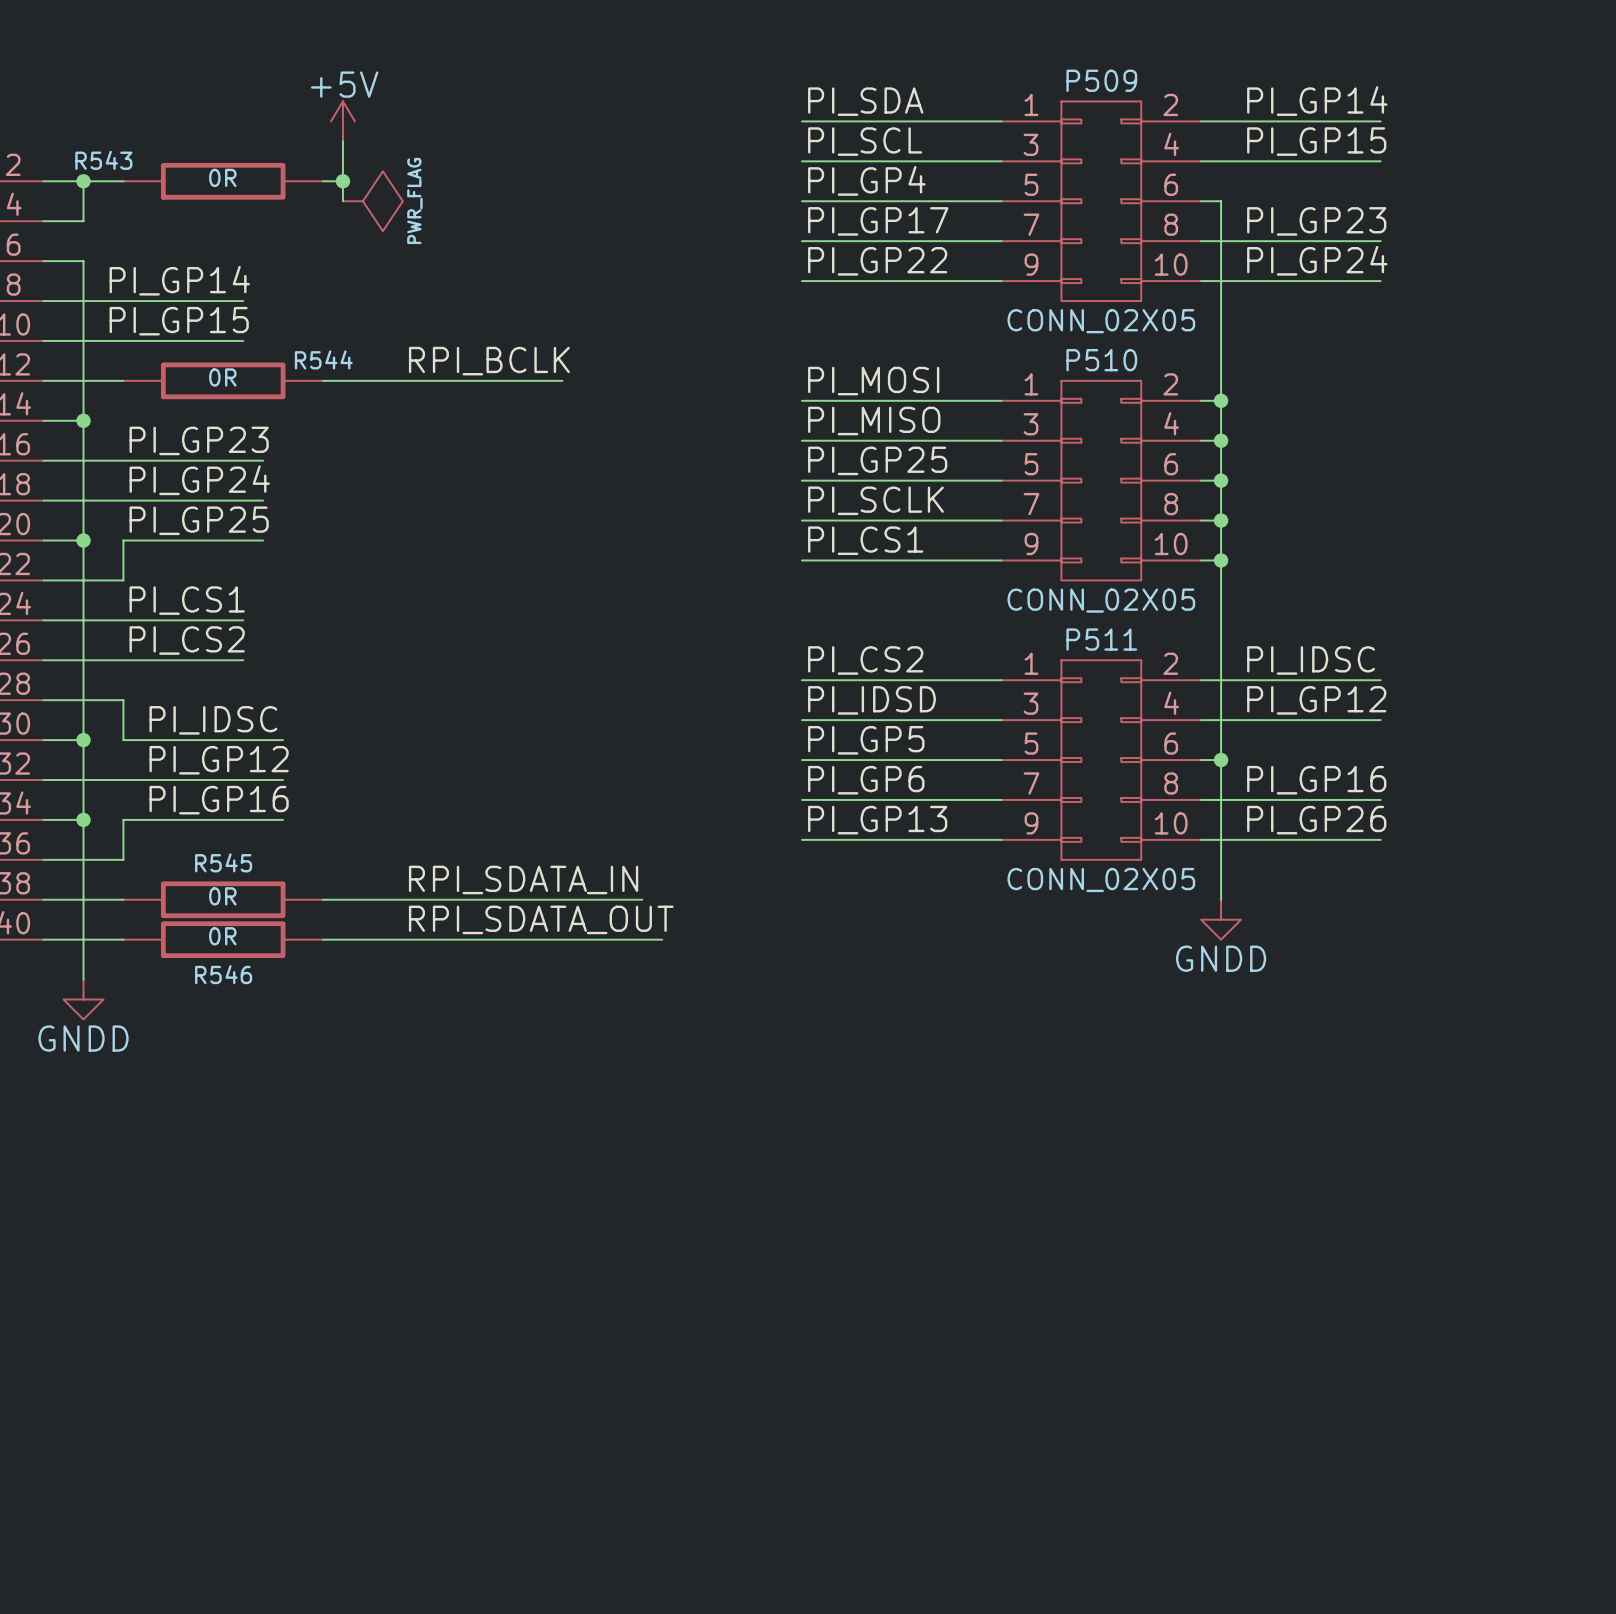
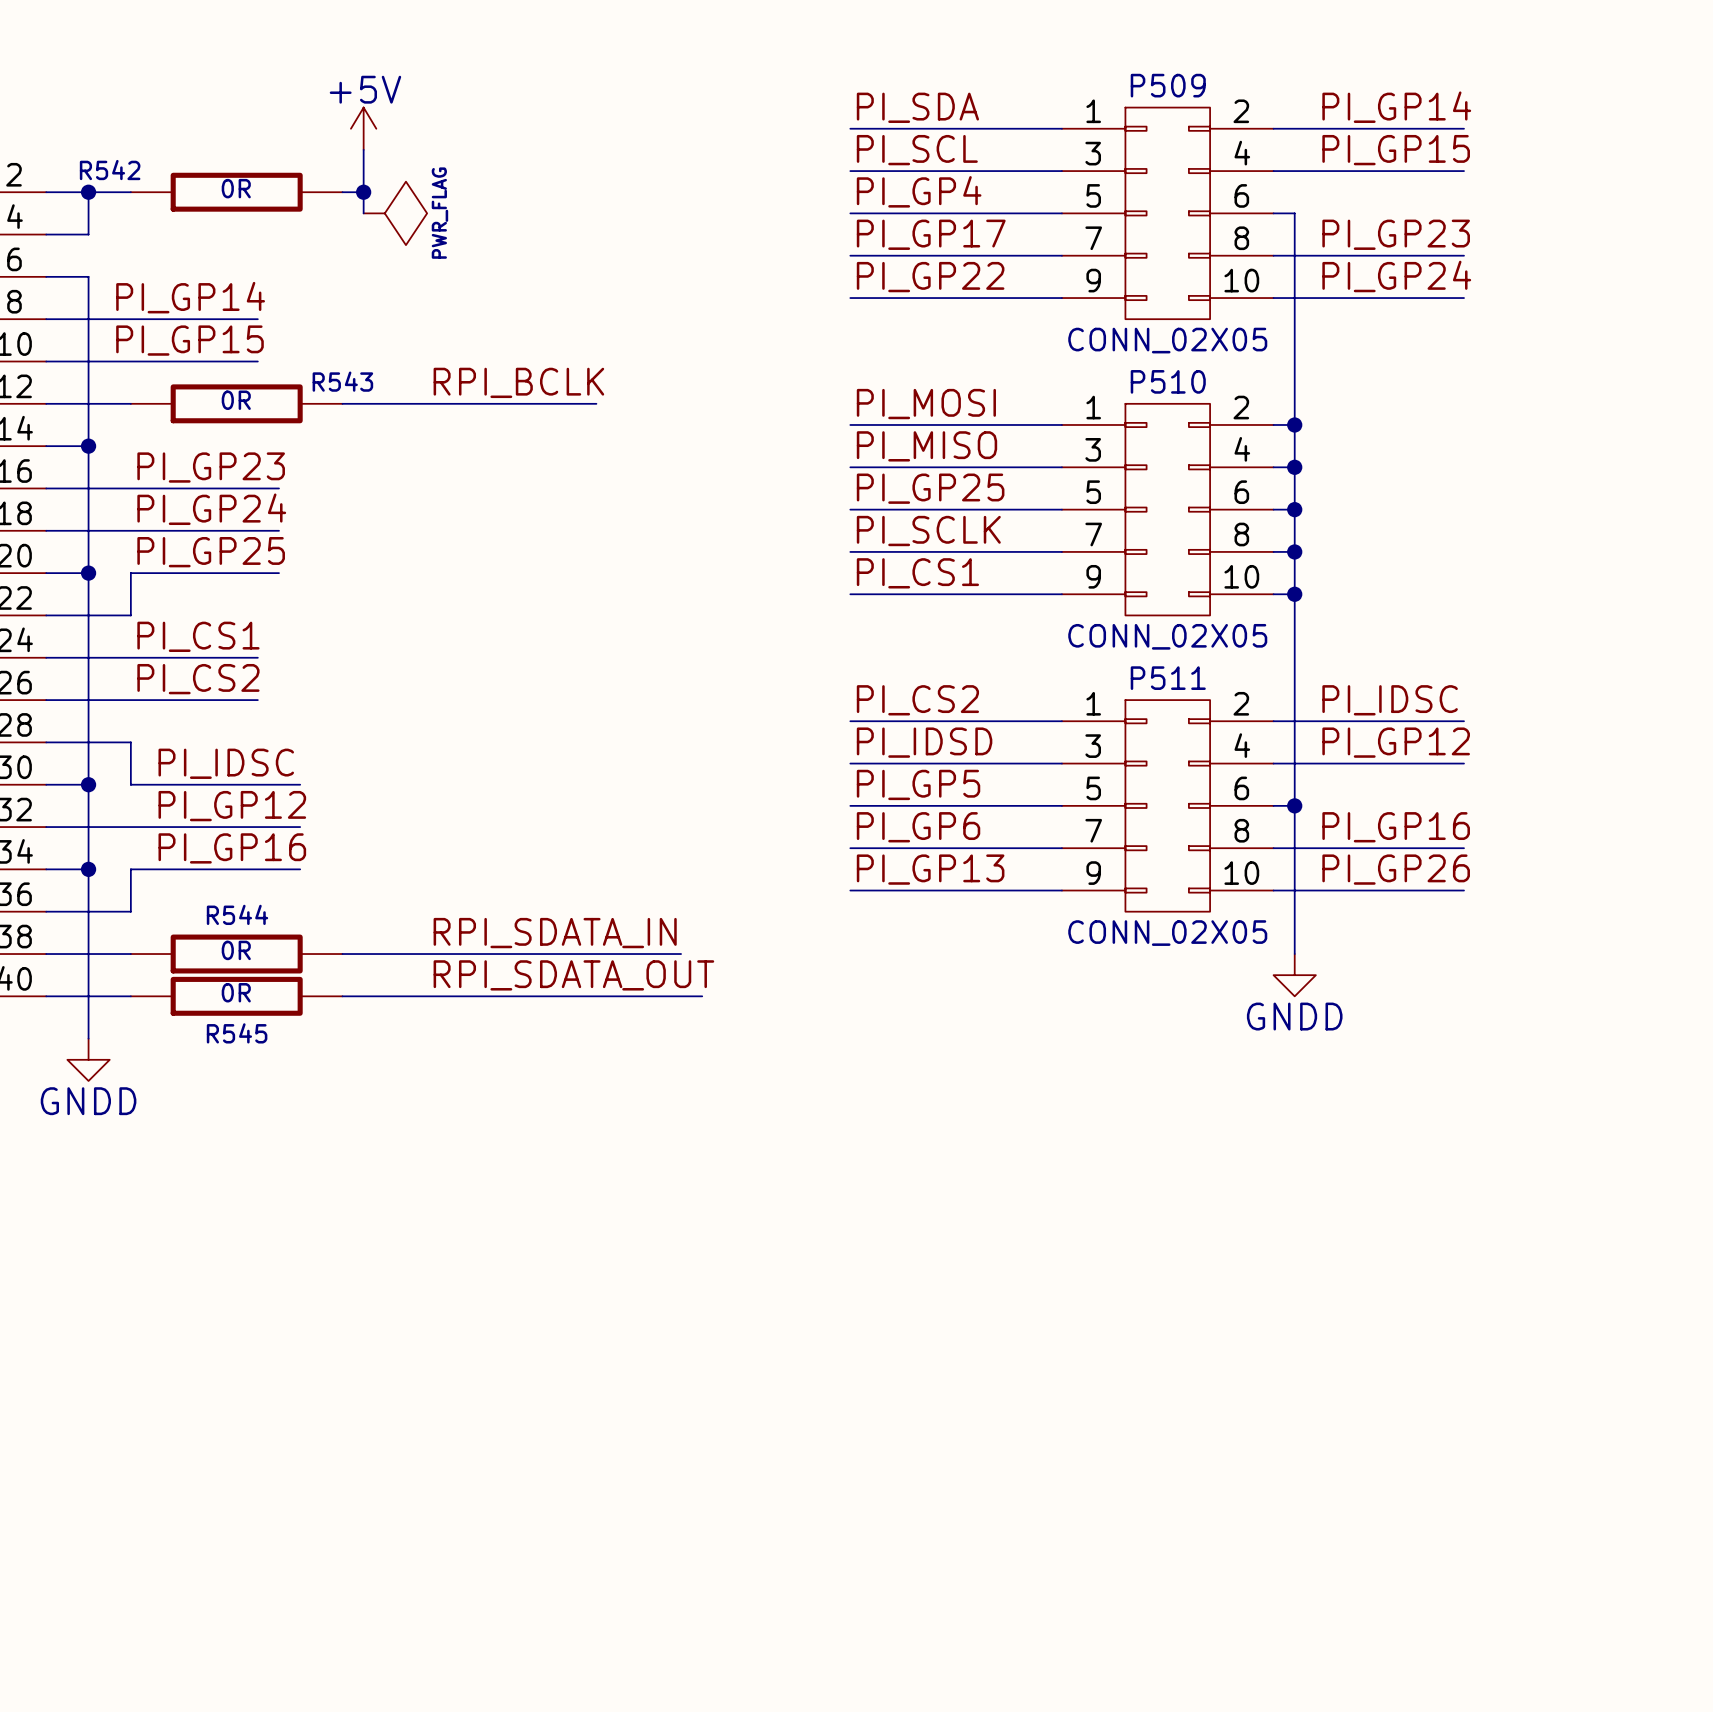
R543 name: R543 (103, 160) -> R542 (110, 170)
R544 name: R544 (323, 359) -> R543 (342, 381)
R545 name: R545 (223, 862) -> R544 (237, 914)
R546 name: R546 (223, 974) -> R545 (237, 1033)

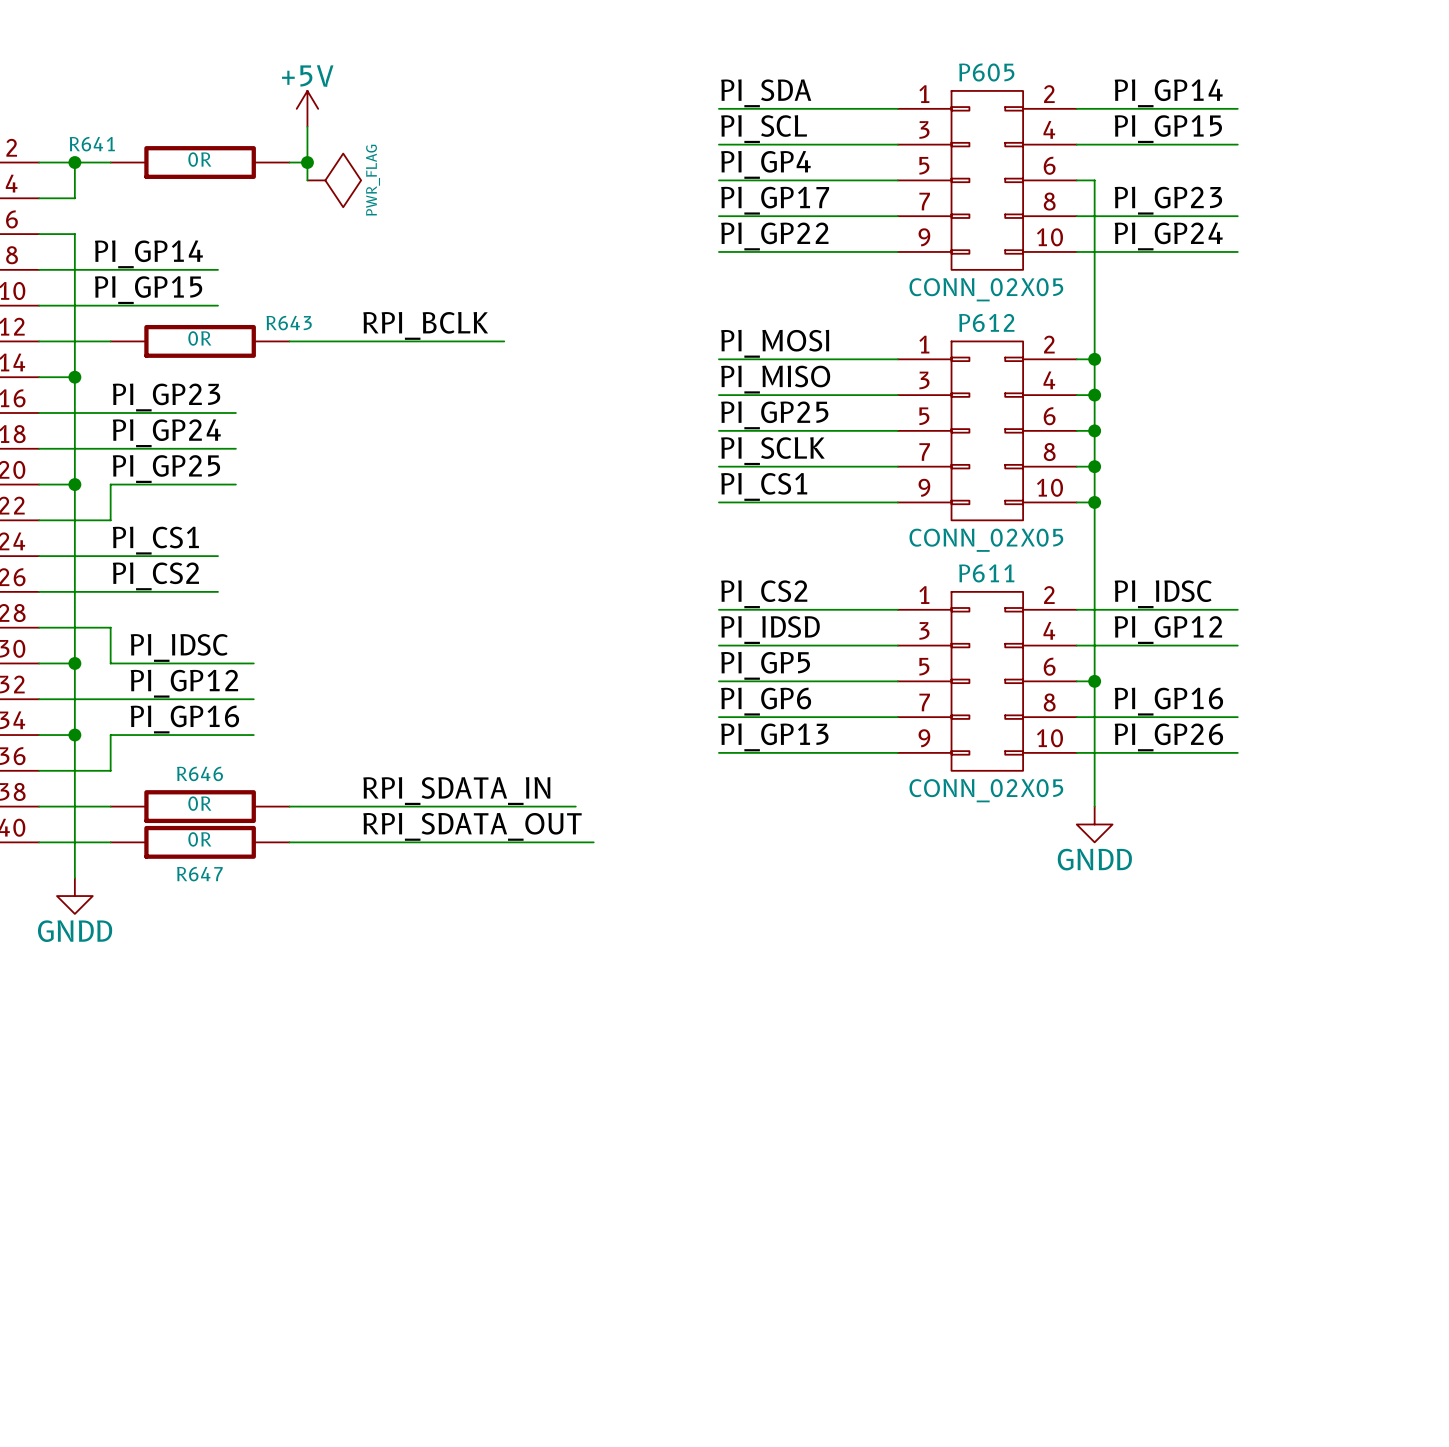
P509 name: P509 (1168, 85) -> P605 (986, 72)
R542 name: R542 (110, 170) -> R641 (92, 144)
R543 name: R543 (342, 381) -> R643 (289, 323)
P510 name: P510 (1168, 381) -> P612 (986, 322)
P511 name: P511 (1168, 678) -> P611 (986, 573)
R544 name: R544 (237, 914) -> R646 (200, 773)
R545 name: R545 (237, 1033) -> R647 (199, 874)

